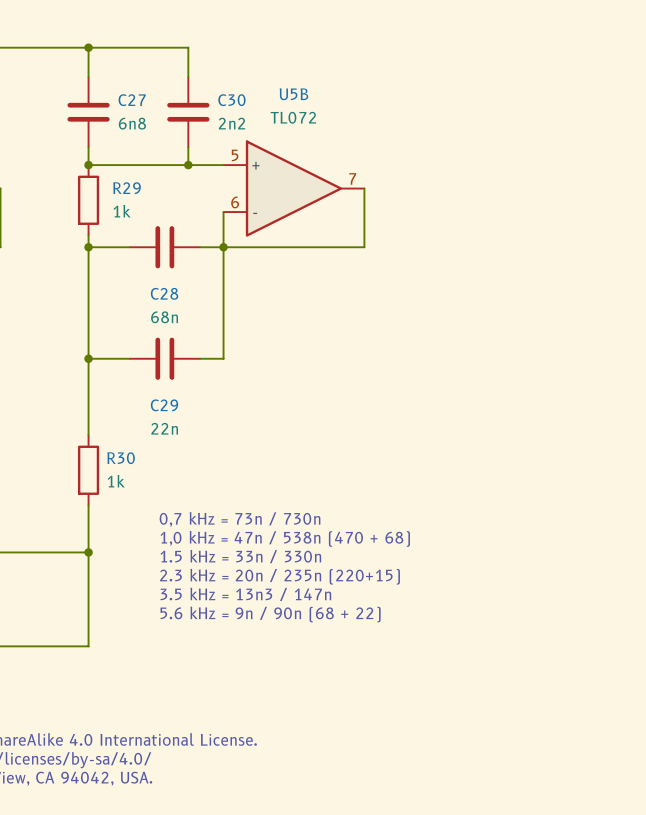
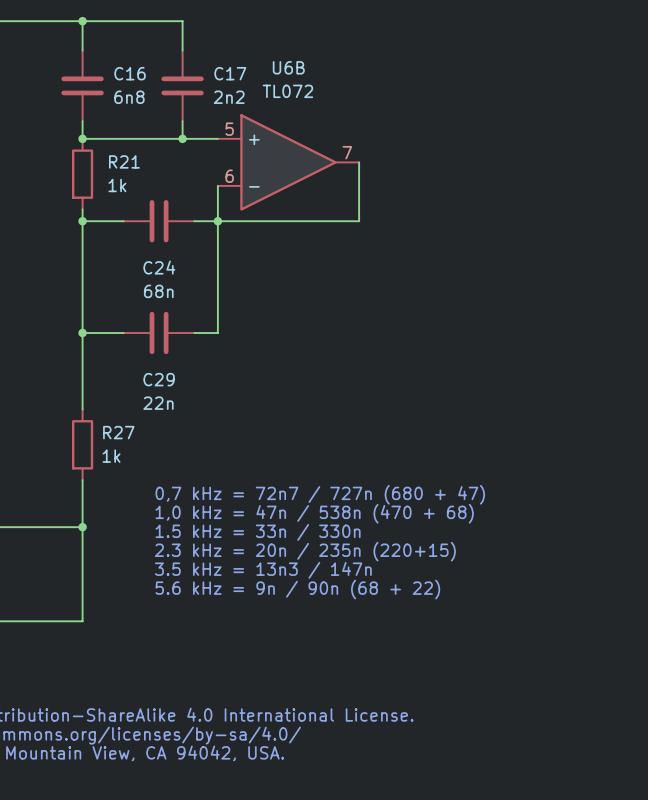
U5B name: U5B (293, 94) -> U6B (288, 67)
C27 name: C27 (132, 100) -> C16 (130, 73)
C30 name: C30 (231, 100) -> C17 (230, 73)
R29 name: R29 (126, 188) -> R21 (124, 161)
C28 name: C28 (164, 293) -> C24 (159, 267)
R30 name: R30 (121, 458) -> R27 (118, 432)
text: 0,7 kHz = 73n / 730n (240, 519) -> 0,7 kHz = 72n7 / 727n (680 + 47) (320, 494)

